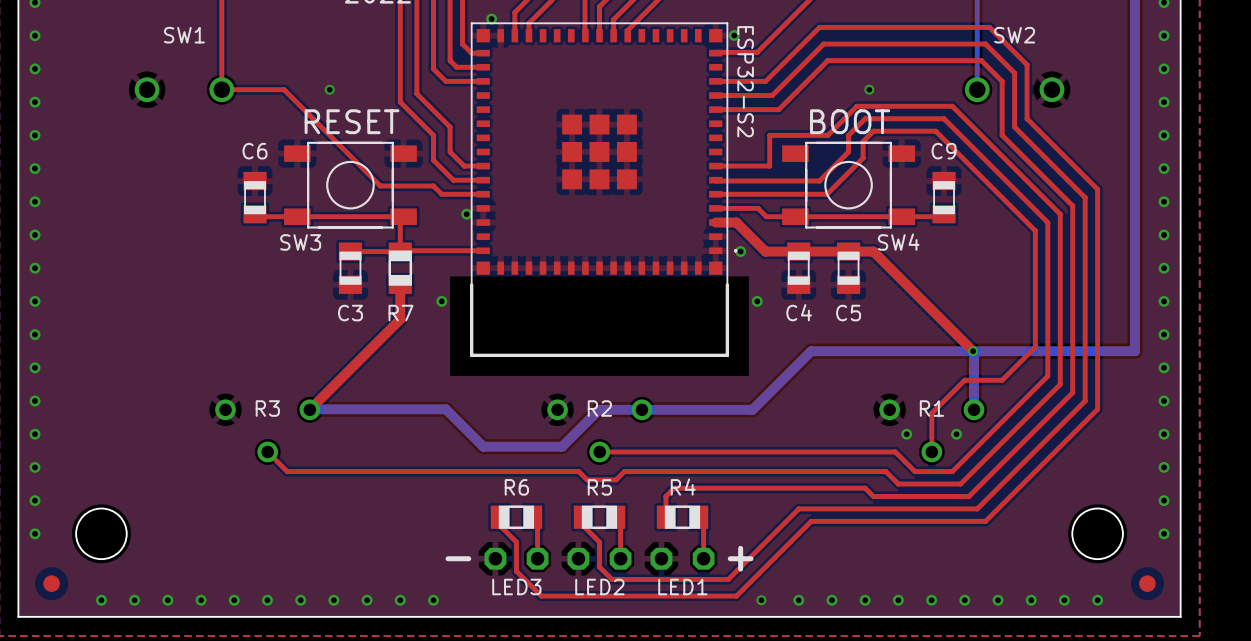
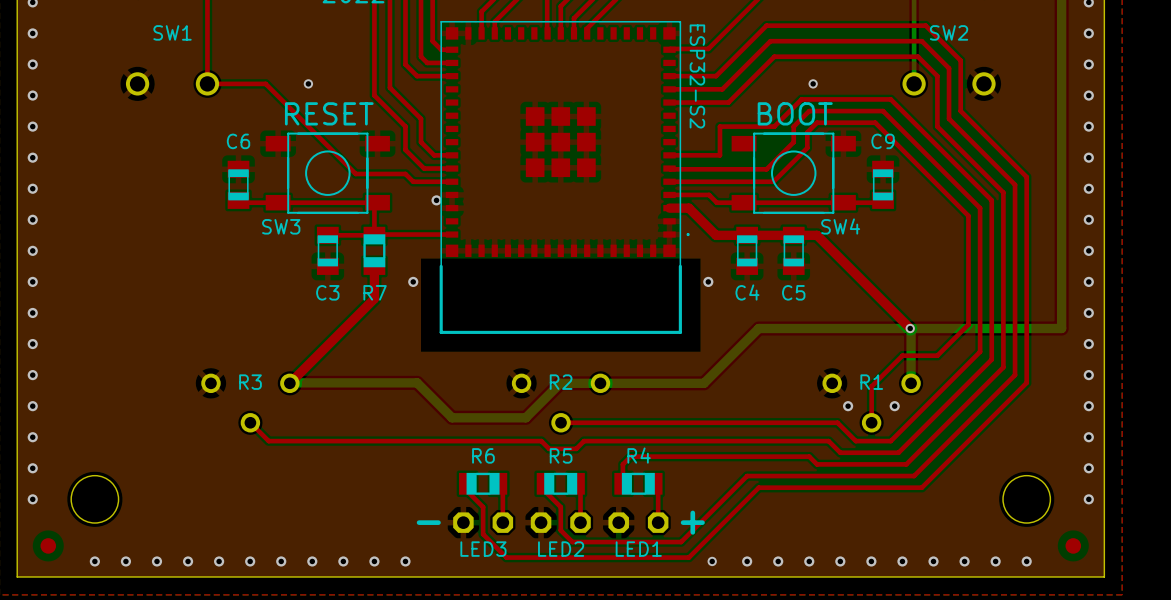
via: (491, 19) -> none
via: (734, 35) -> none
via: (740, 251) -> none

